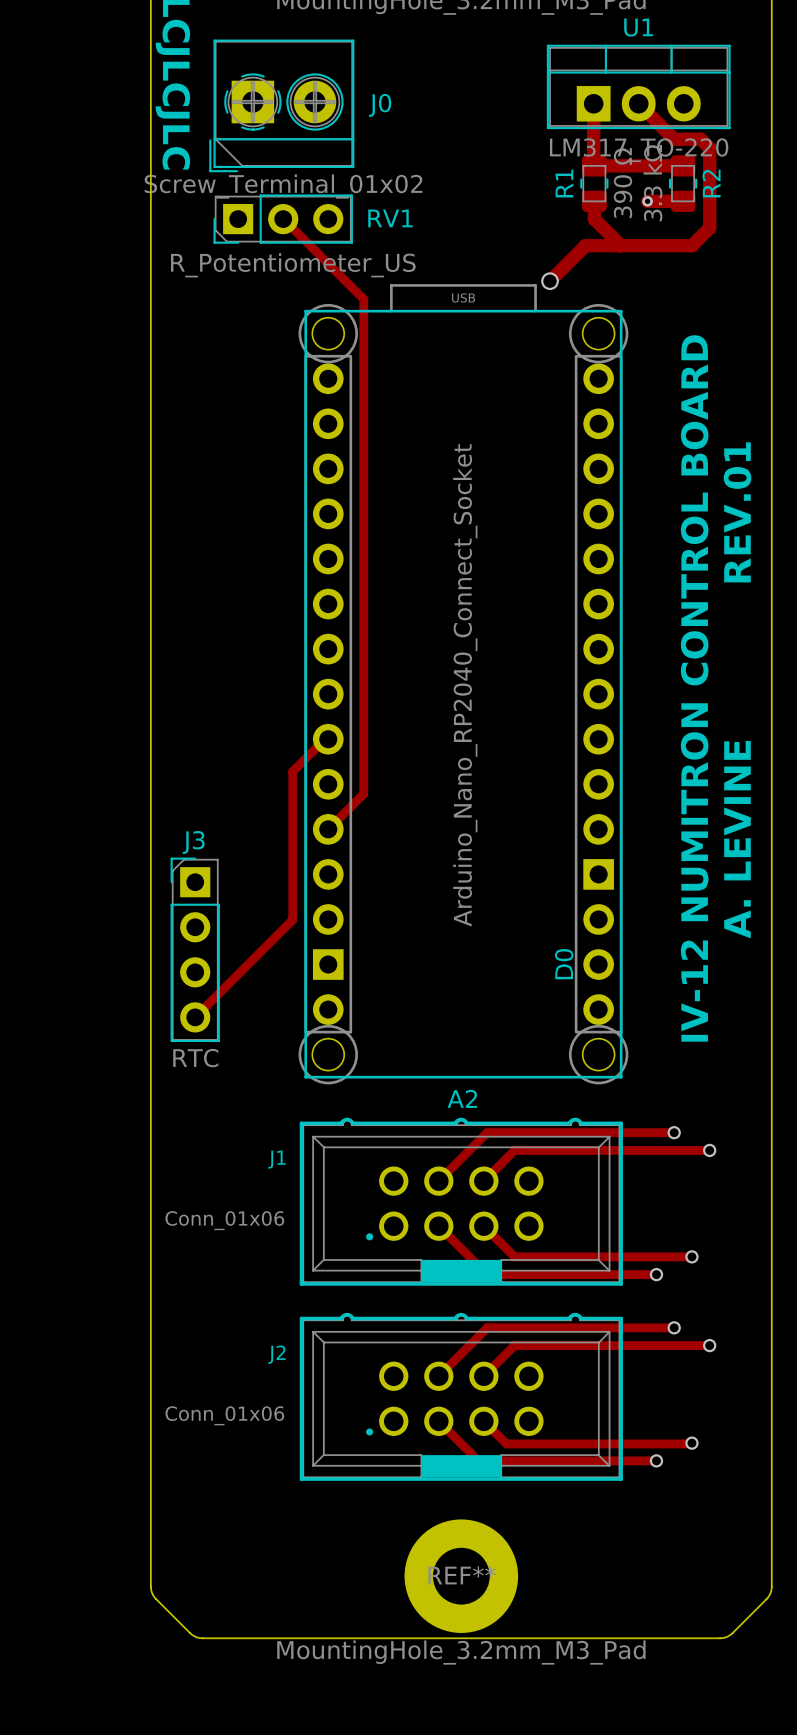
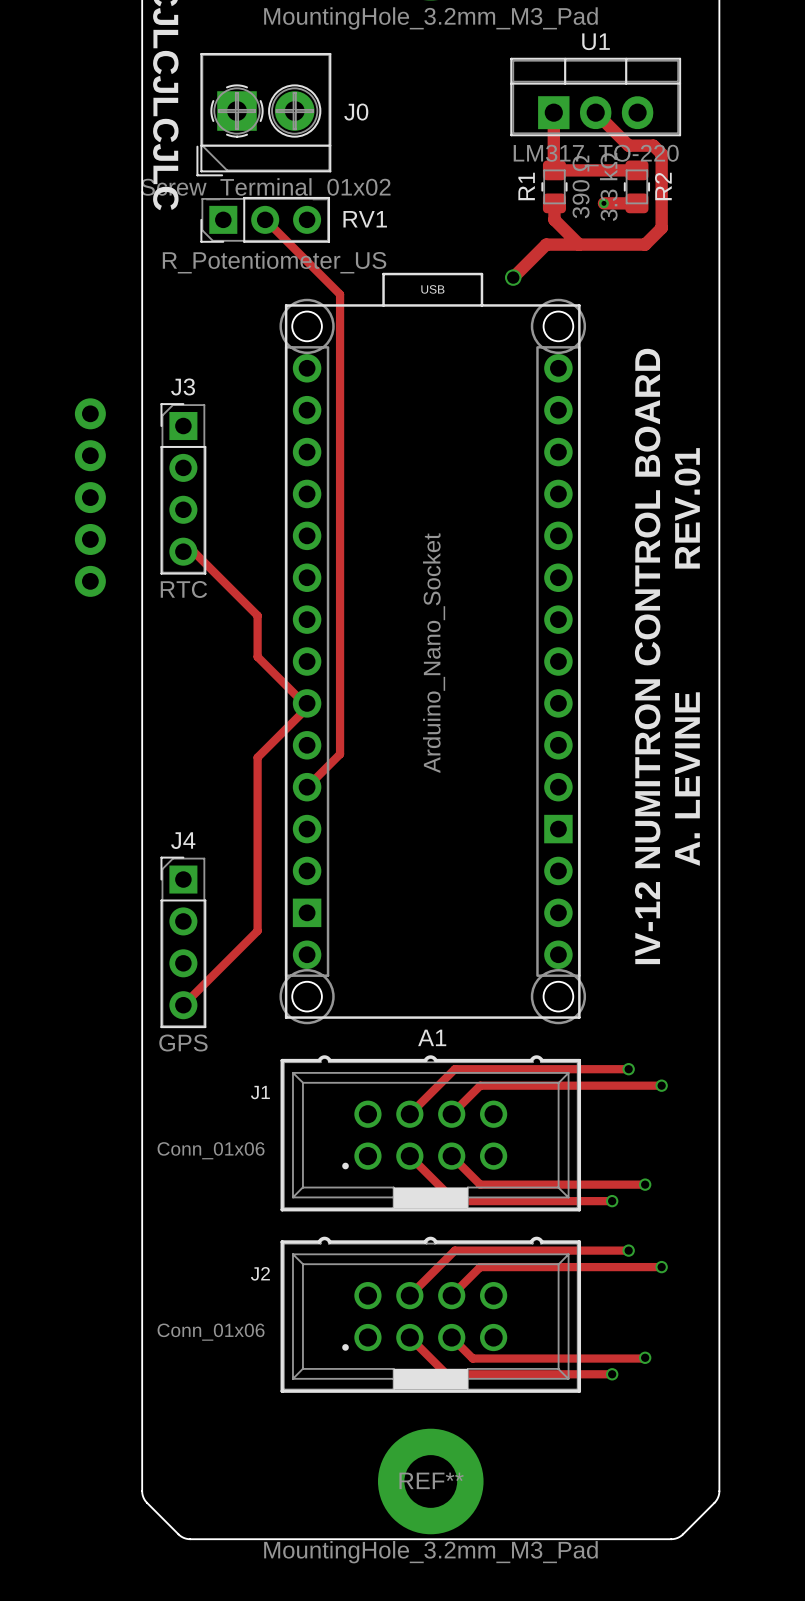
part: none -> (90, 413)
part: none -> (90, 455)
part: none -> (90, 497)
part: none -> (90, 539)
part: none -> (90, 581)
A1: none -> Arduino_Nano_Socket (432, 648)
A2: Arduino_Nano_RP2040_Connect_Socket (463, 684) -> none
track: (325, 739) (292, 771) (292, 919) (195, 1017) -> (304, 703) (257, 656) (257, 615) (193, 551) (183, 551)
track: none -> (307, 703) (307, 708) (257, 757) (257, 930) (183, 1005)
J3 position: (195, 949) -> (183, 488)
J4: none -> GPS (183, 942)

